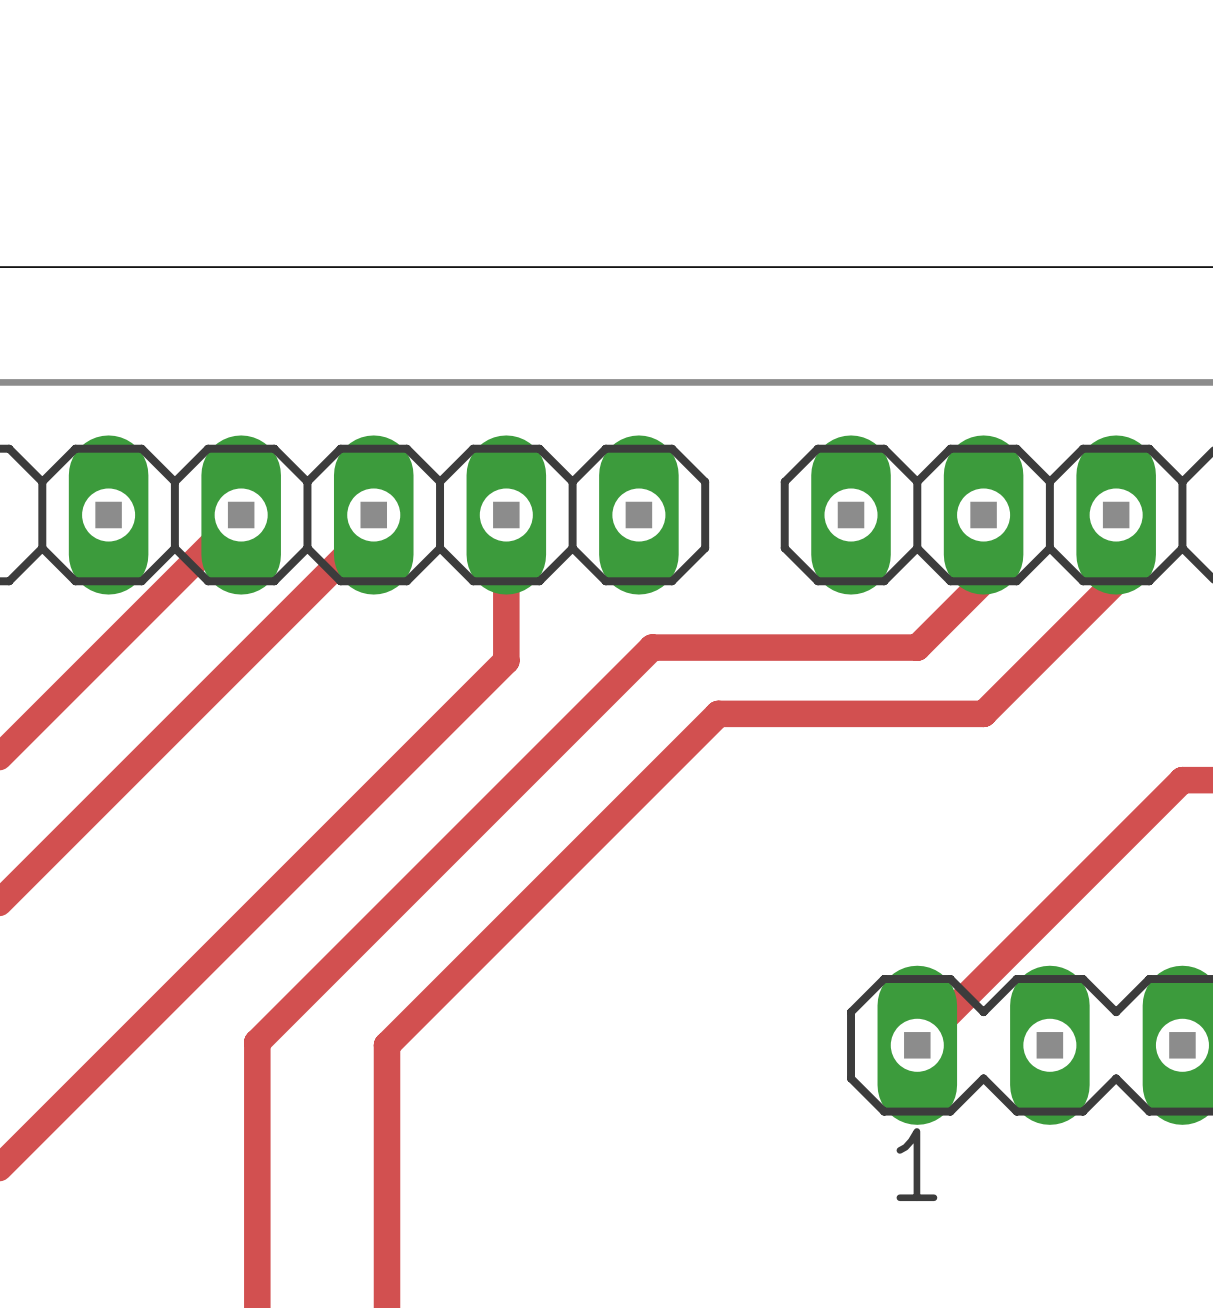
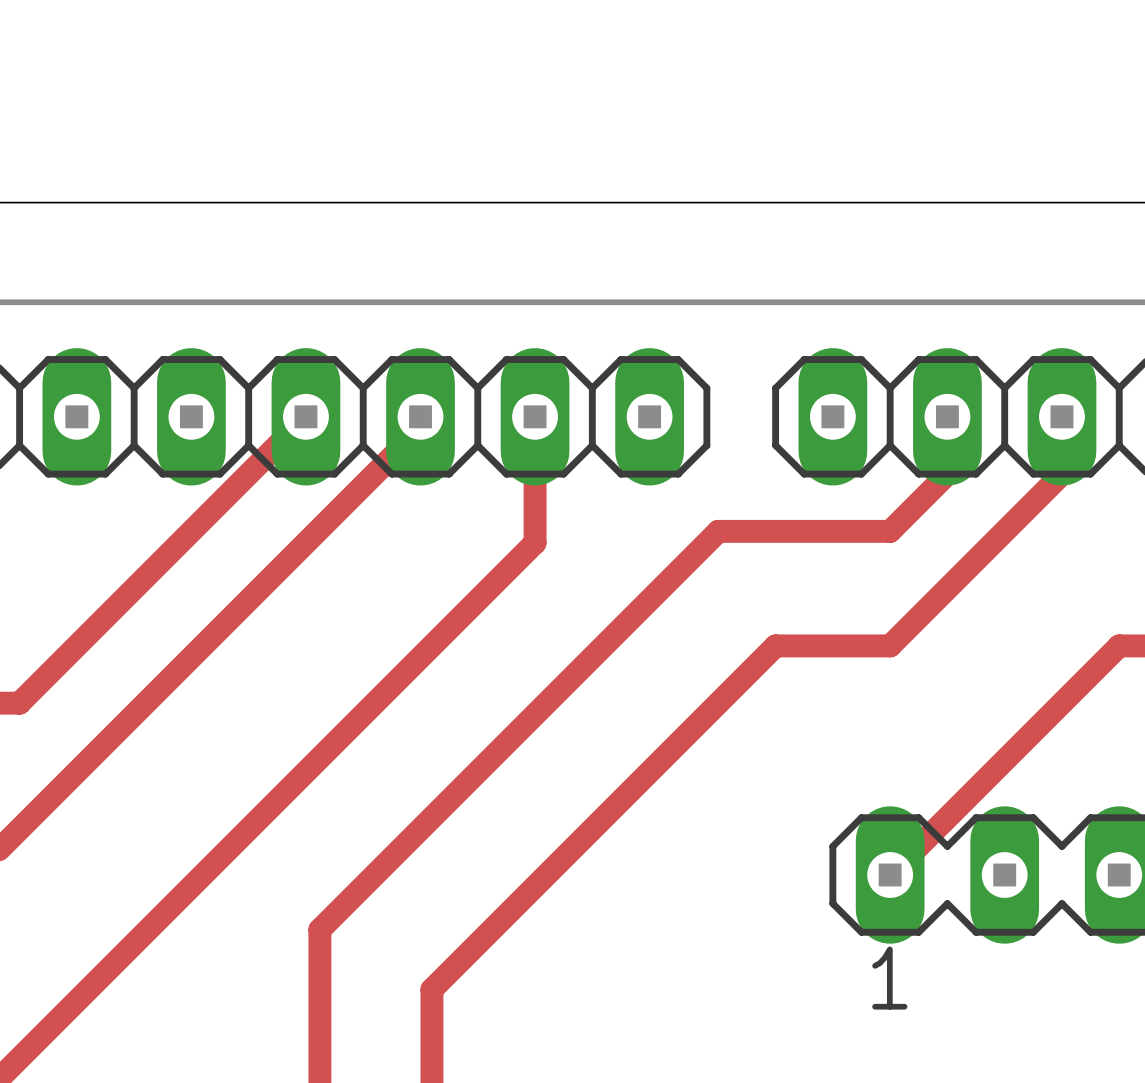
track: (718, 647) (652, 647) (257, 1042) (257, 1108) -> (718, 531) (319, 929)
track: (983, 713) (718, 713) (387, 1045) (387, 1177) -> (947, 588) (890, 645) (775, 645) (431, 989)

